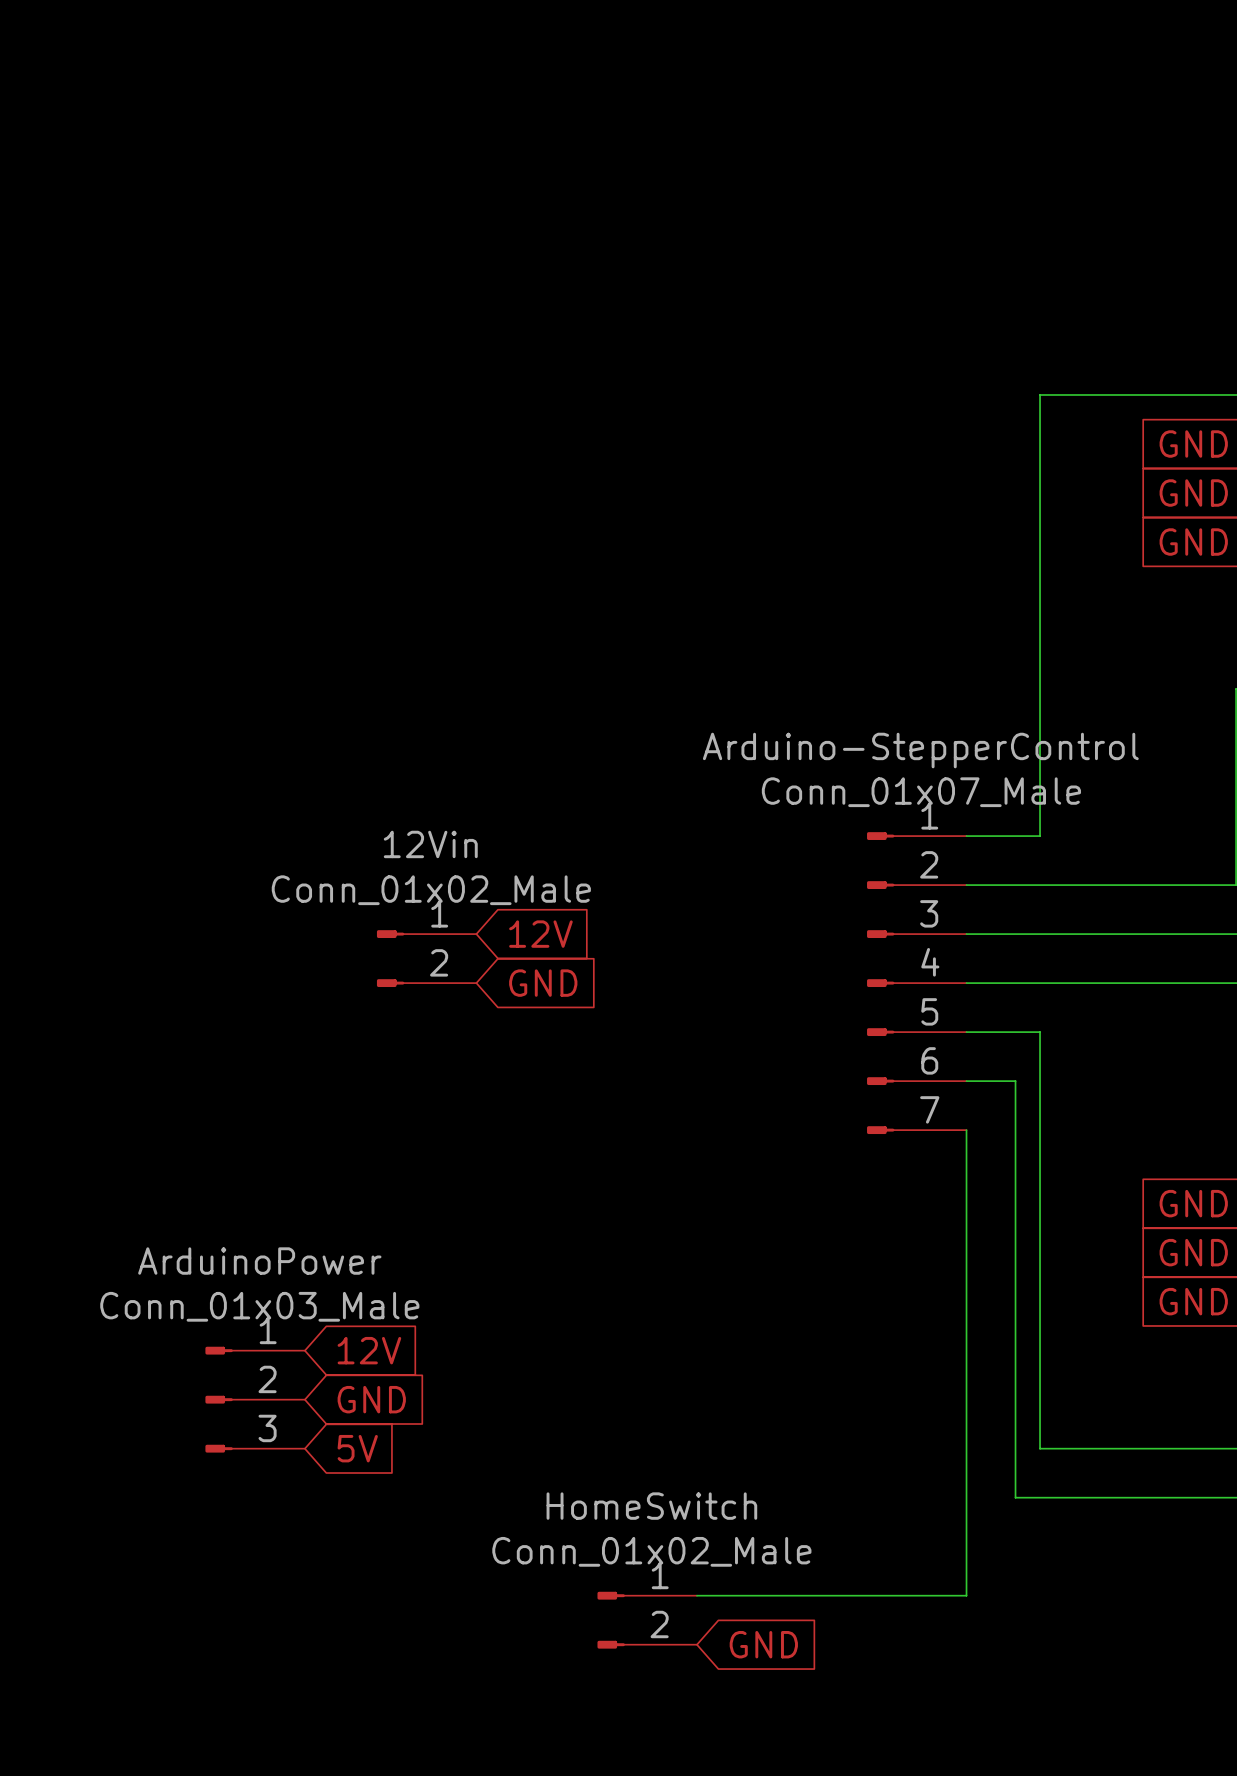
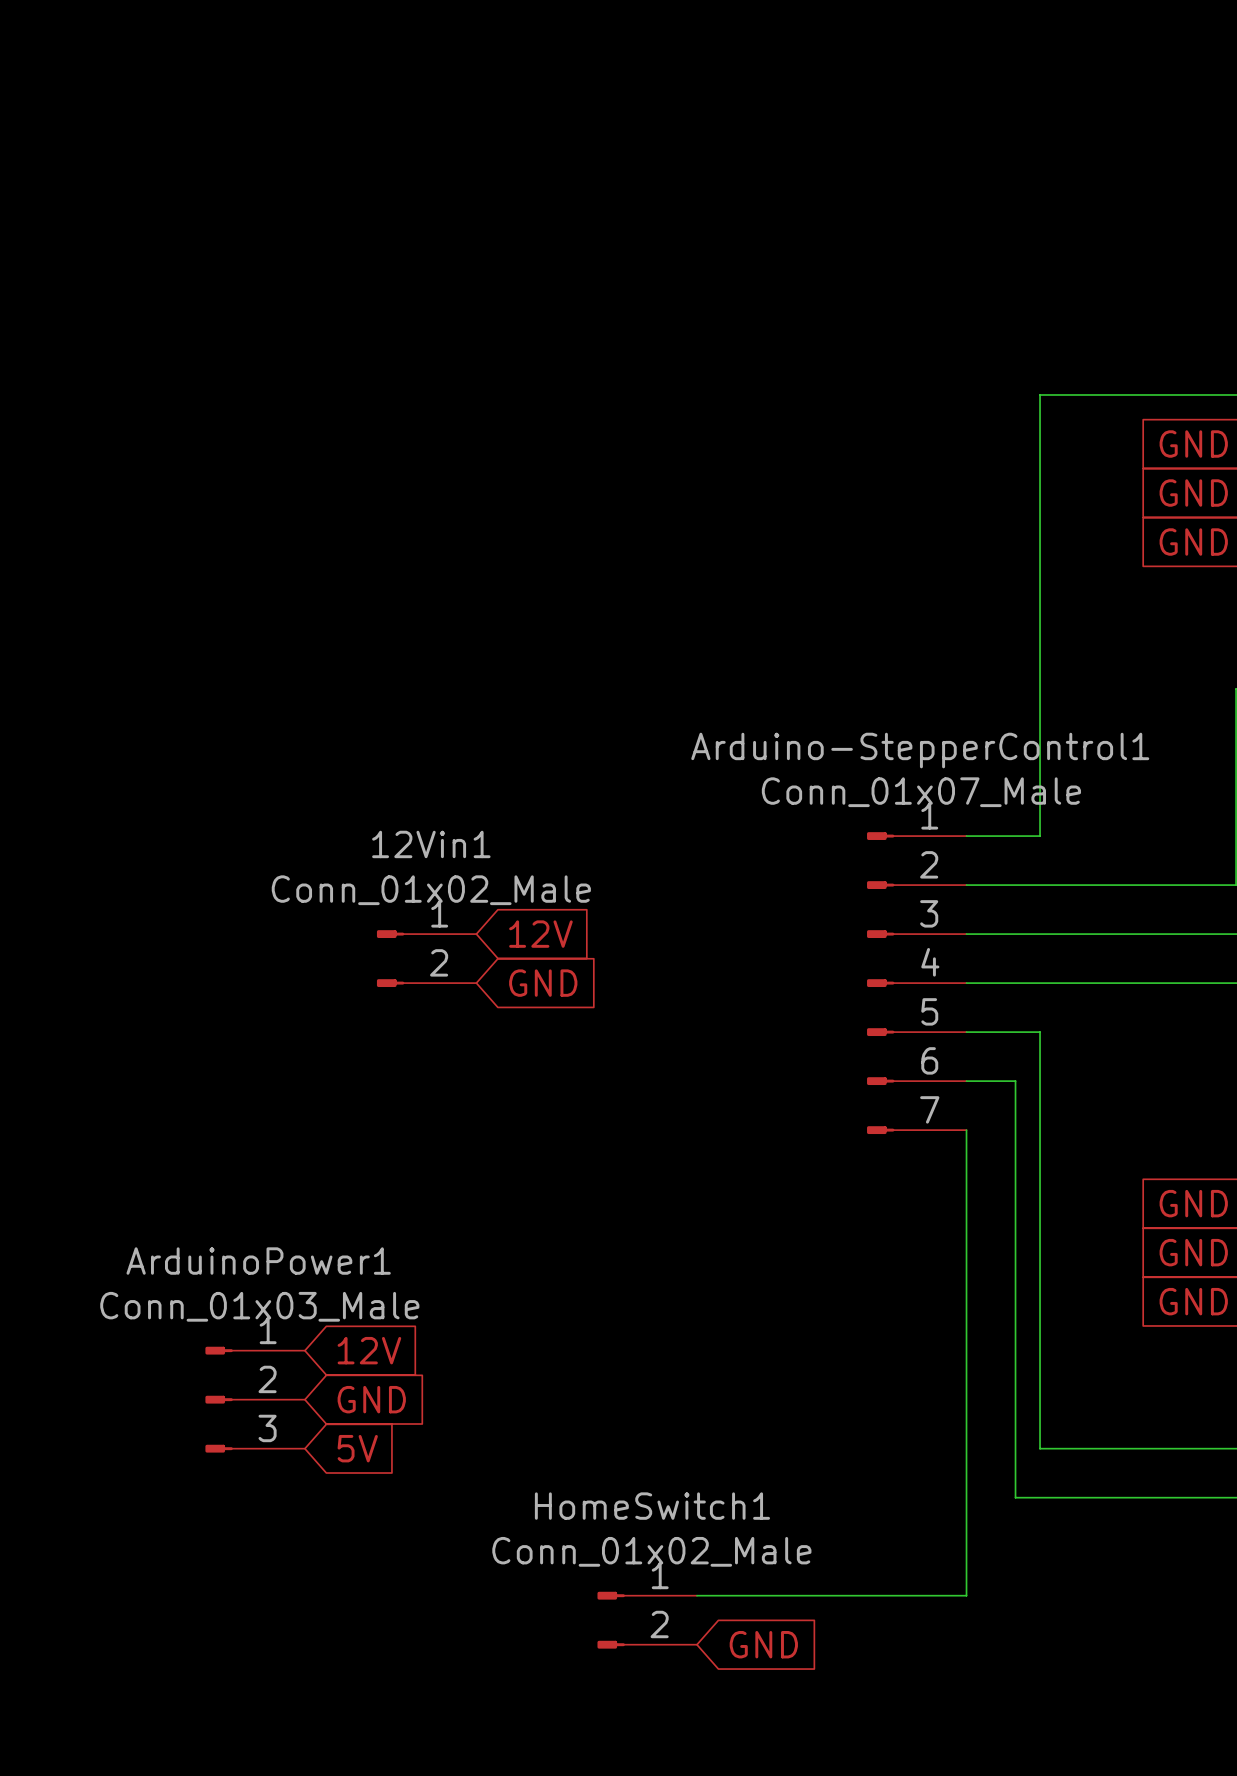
Arduino-StepperControl name: Arduino-StepperControl (920, 750) -> Arduino-StepperControl1 (920, 750)
12Vin name: 12Vin (430, 844) -> 12Vin1 (431, 844)
ArduinoPower name: ArduinoPower (259, 1261) -> ArduinoPower1 (258, 1261)
HomeSwitch name: HomeSwitch (651, 1506) -> HomeSwitch1 (652, 1506)

